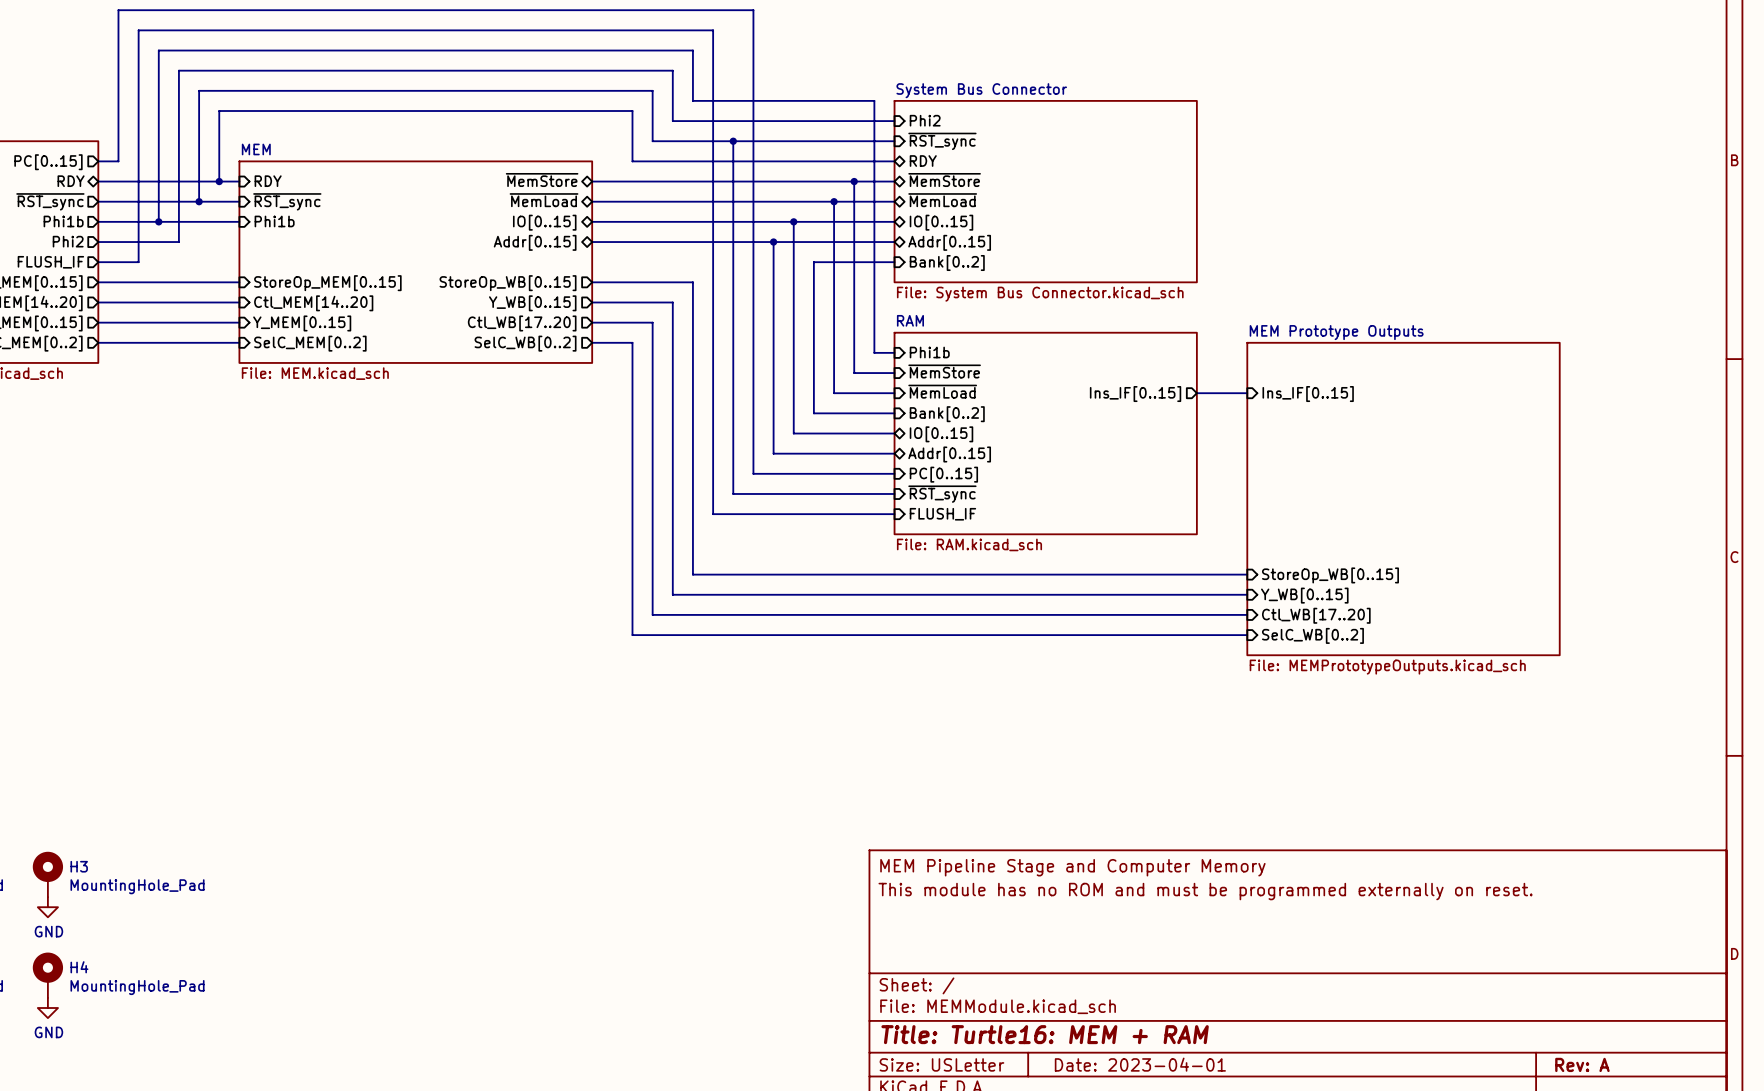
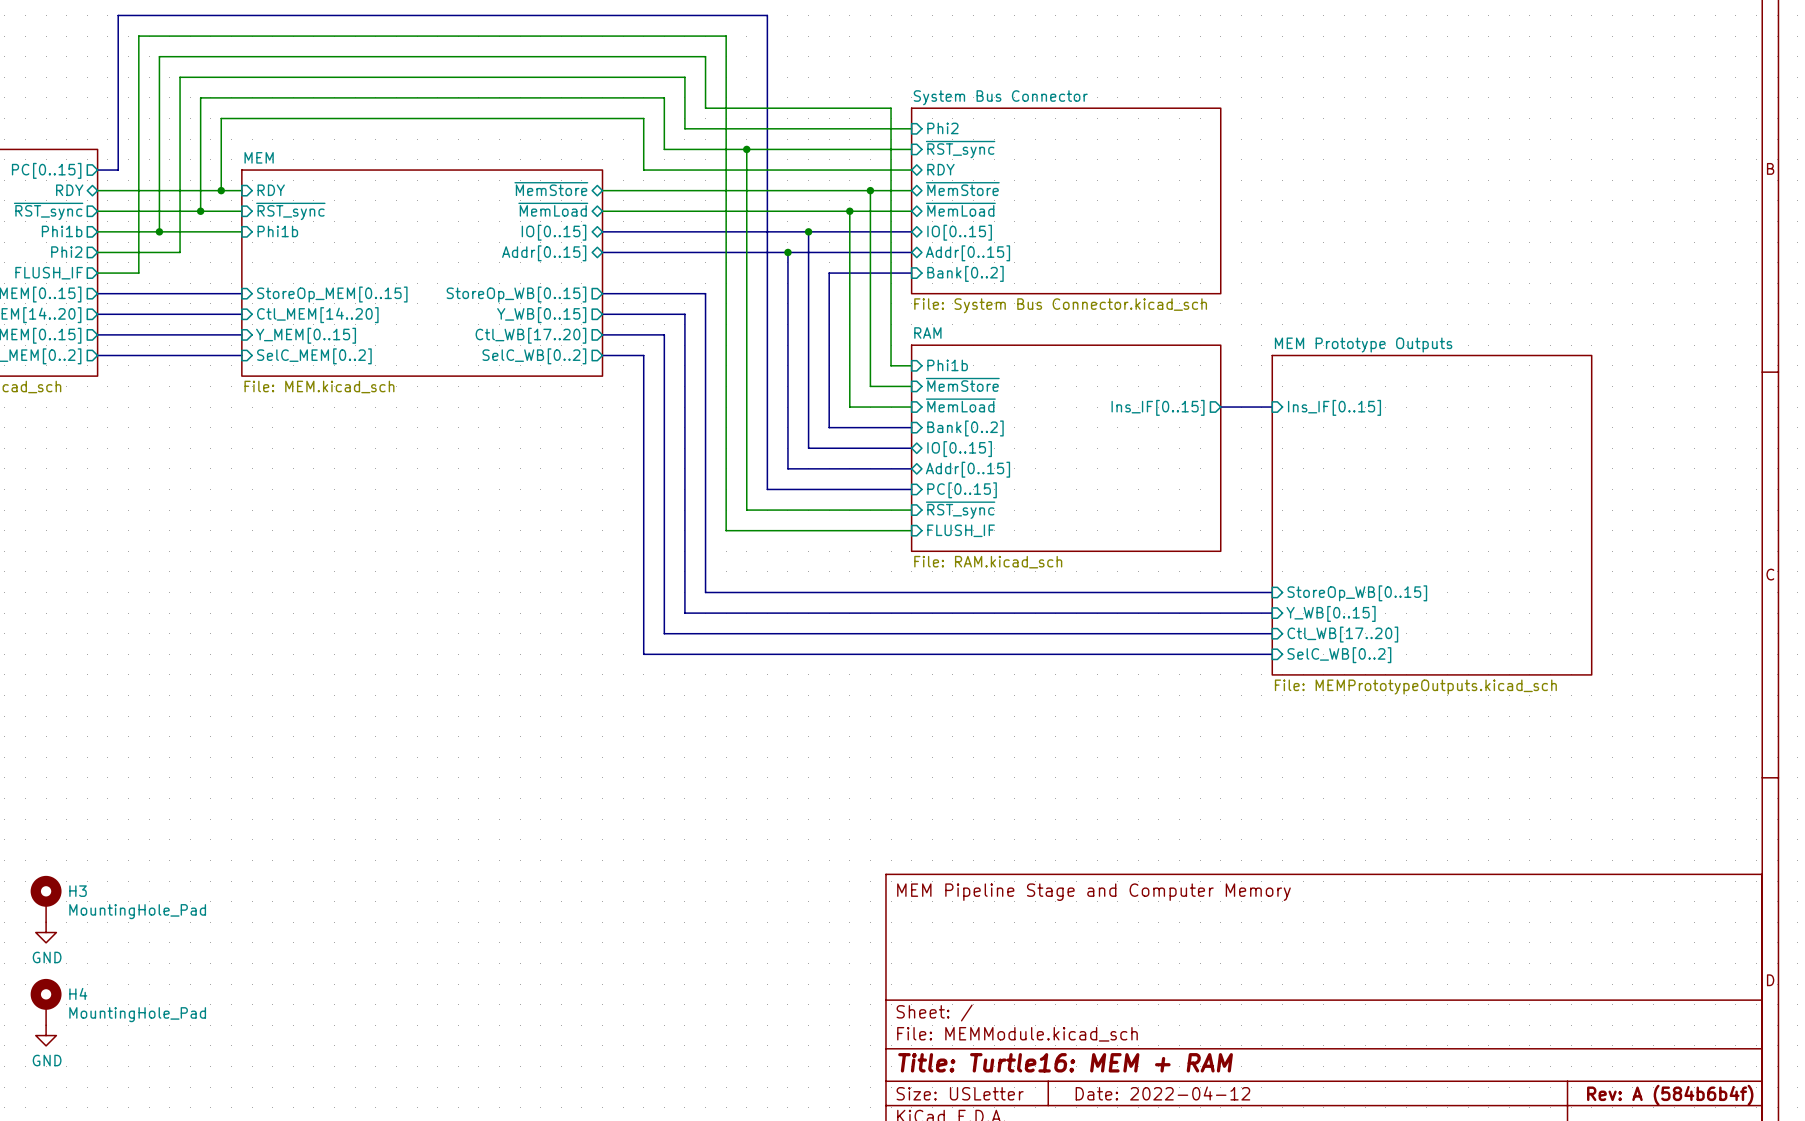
title block: This module has no ROM and must be programmed externally on reset. (1205, 891) -> none
title block: Date: 2023-04-01 (1140, 1064) -> Date: 2022-04-12 (1162, 1093)
title block: Rev: A (1582, 1064) -> Rev: A (584b6b4f) (1670, 1095)

